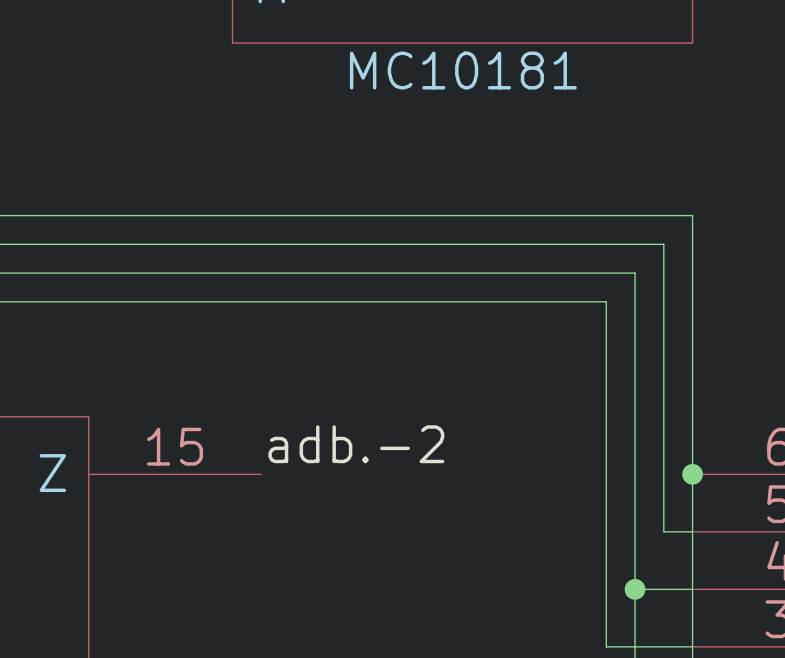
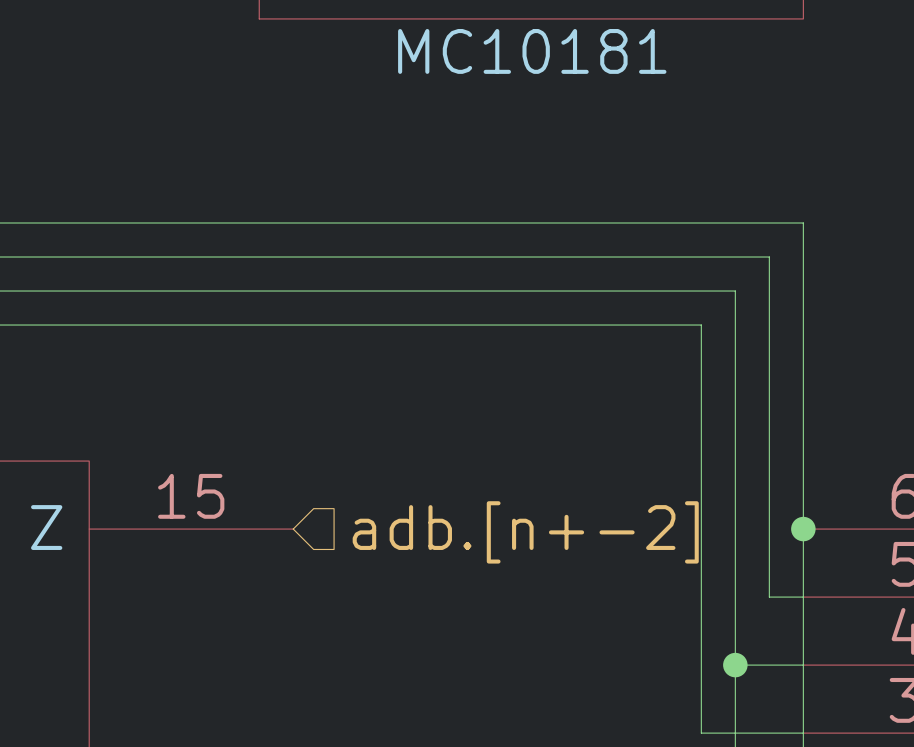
label: adb.-2 (356, 444) -> none
hierarchical label: none -> adb.[n+-2] (525, 532)

